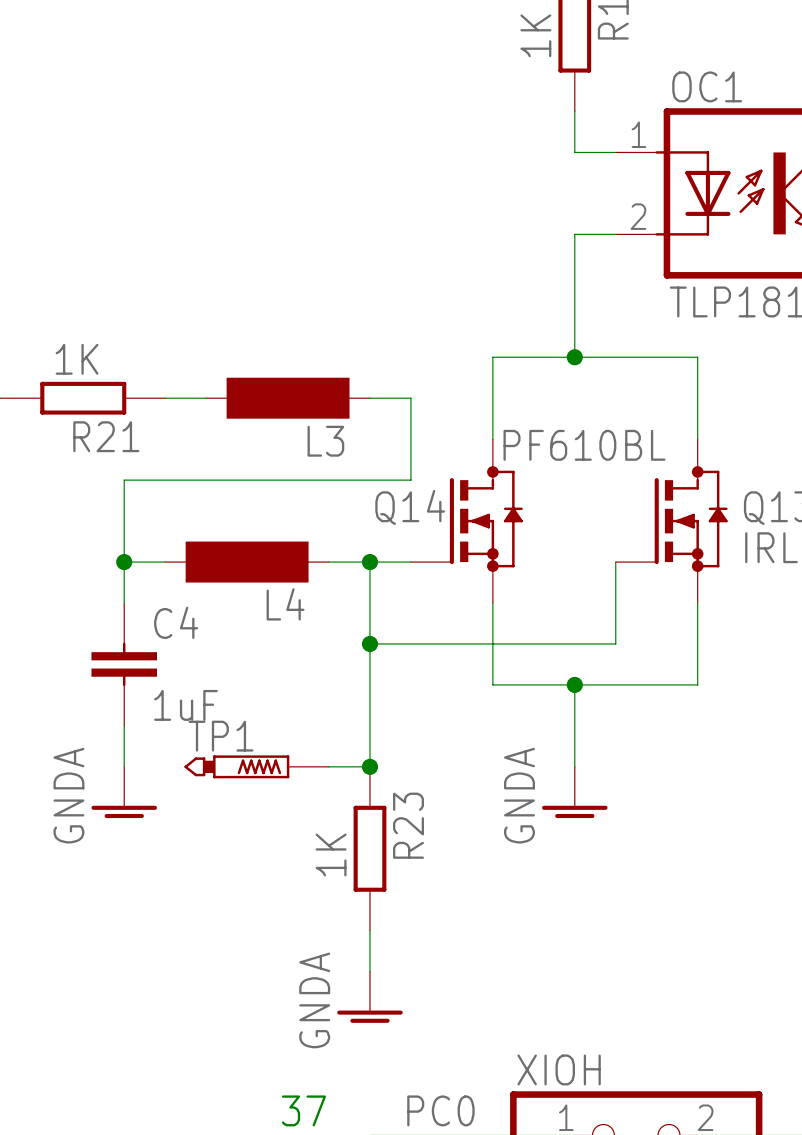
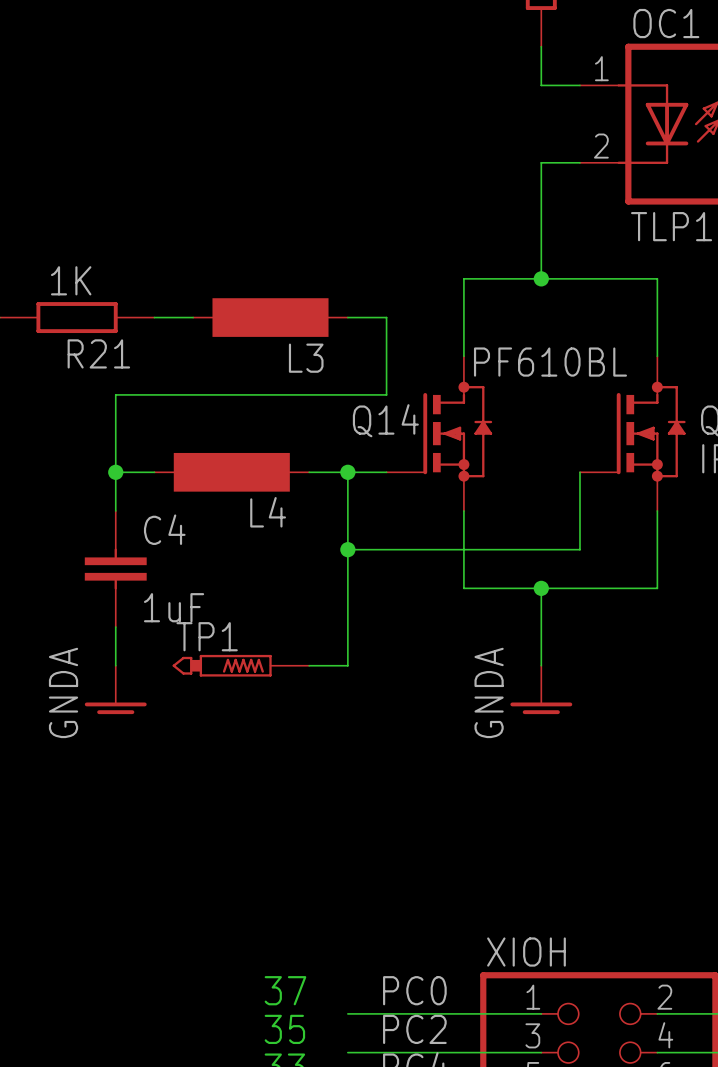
junction: (369, 766) -> none
R23: 1K (369, 848) -> none
wire: (369, 930) (369, 971) -> none
power symbol: GNDA (369, 997) -> none

